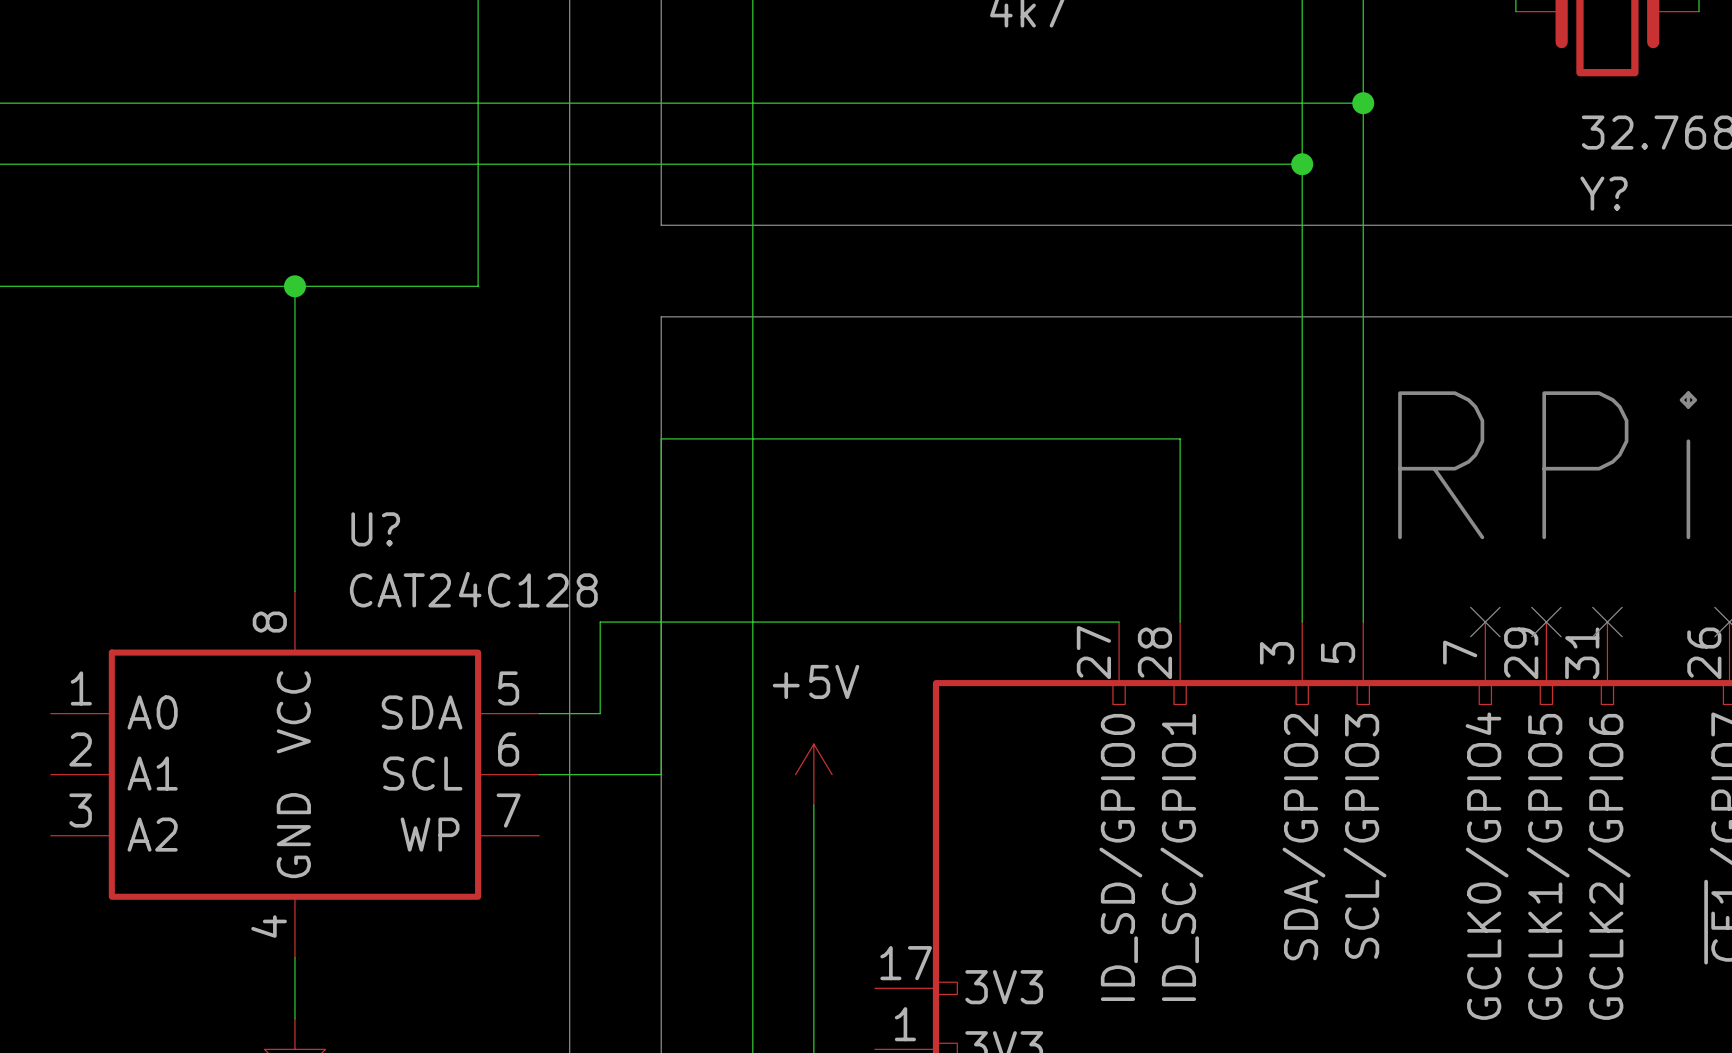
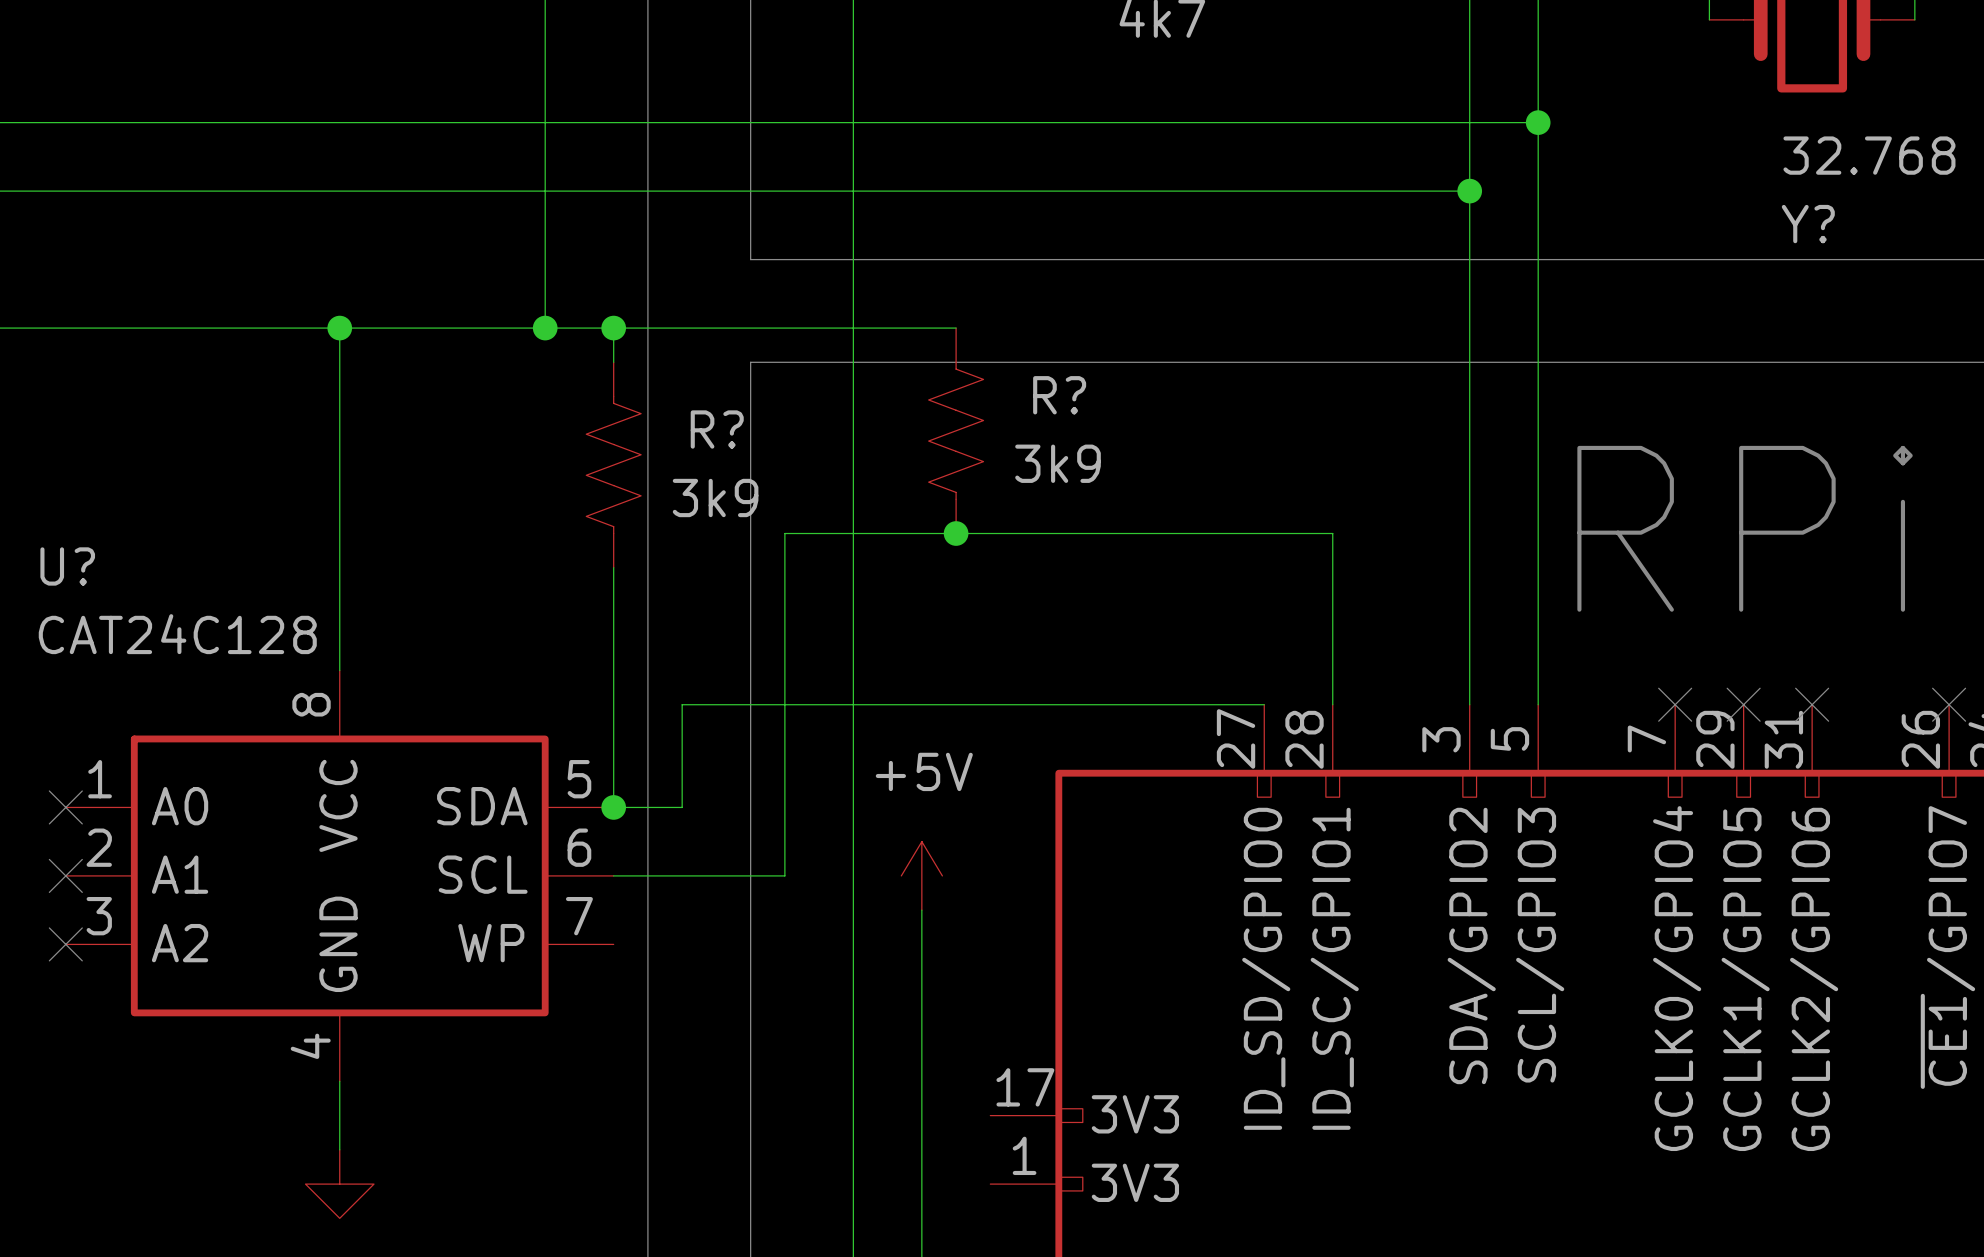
wire: none -> (545, 328) (956, 328)
junction: none -> (545, 328)
wire: none -> (613, 328) (613, 362)
junction: none -> (613, 328)
R?: none -> 3k9 (956, 430)
R?: none -> 3k9 (613, 465)
junction: none -> (956, 533)
wire: (1180, 469) (1180, 438) (661, 438) (661, 774) -> (1332, 533) (784, 533) (784, 875) (750, 875)
wire: none -> (613, 567) (613, 807)
U? name position: U? (375, 529) -> U? (67, 566)
U? value position: CAT24C128 (473, 589) -> CAT24C128 (177, 634)
no-connect mark: none -> (65, 807)
junction: none -> (613, 807)
no-connect mark: none -> (65, 875)
no-connect mark: none -> (65, 944)

